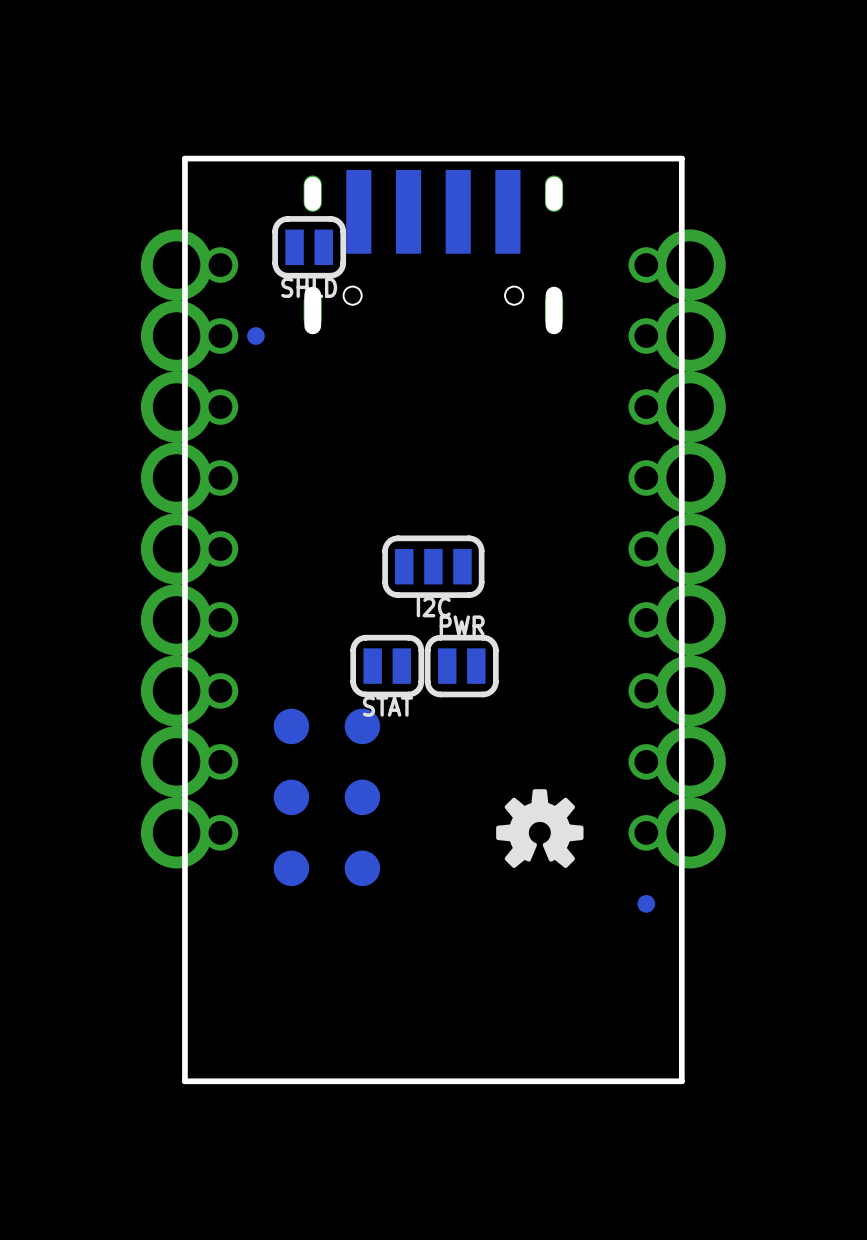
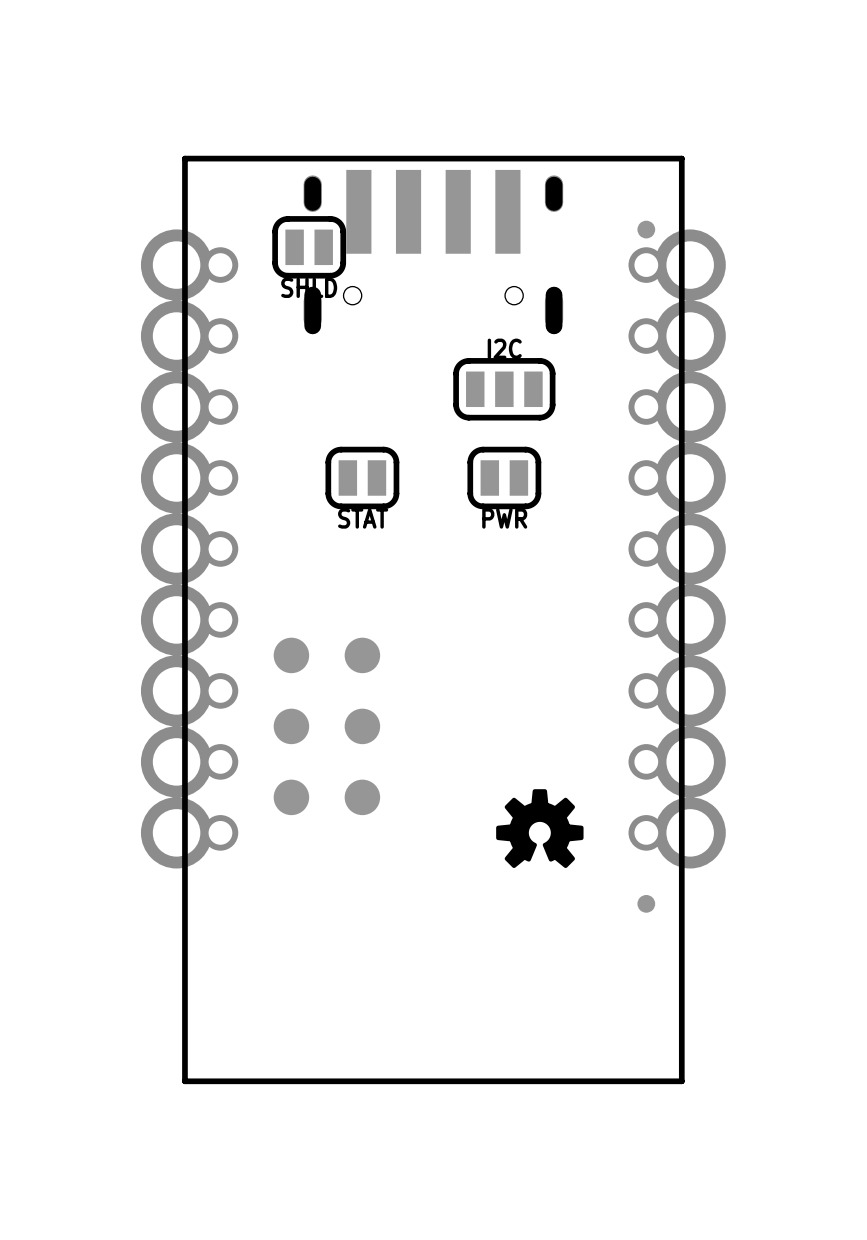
part position: (255, 336) -> (646, 229)
I2C position: (433, 566) -> (504, 389)
I2C name position: I2C (433, 607) -> I2C (504, 348)
PWR name position: PWR (462, 625) -> PWR (504, 518)
part: none -> (291, 655)
part: none -> (362, 655)
STAT position: (387, 666) -> (362, 477)
PWR position: (461, 666) -> (504, 477)
part: (291, 868) -> none
part: (362, 868) -> none

